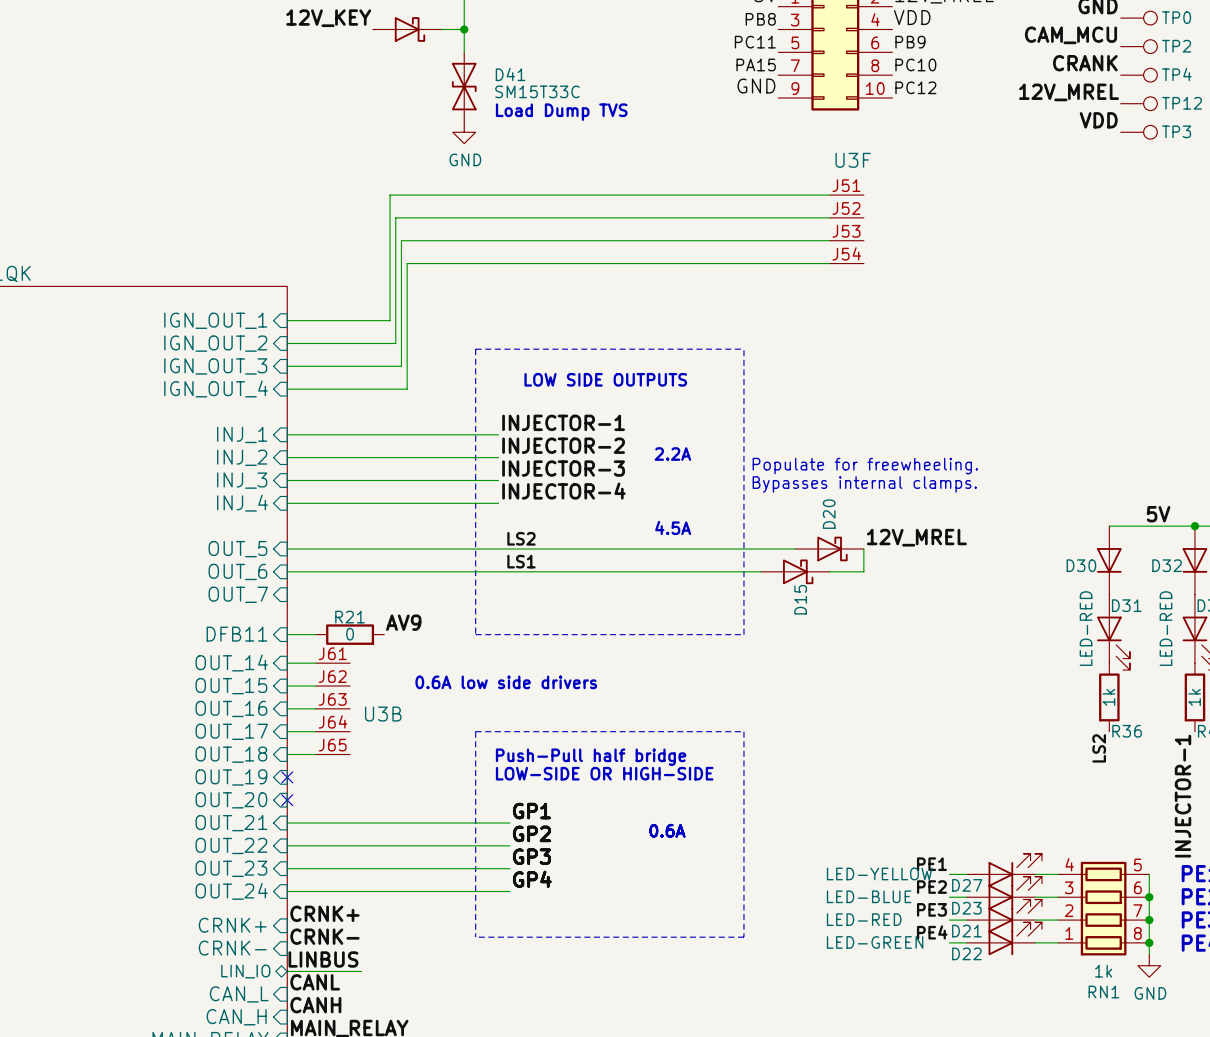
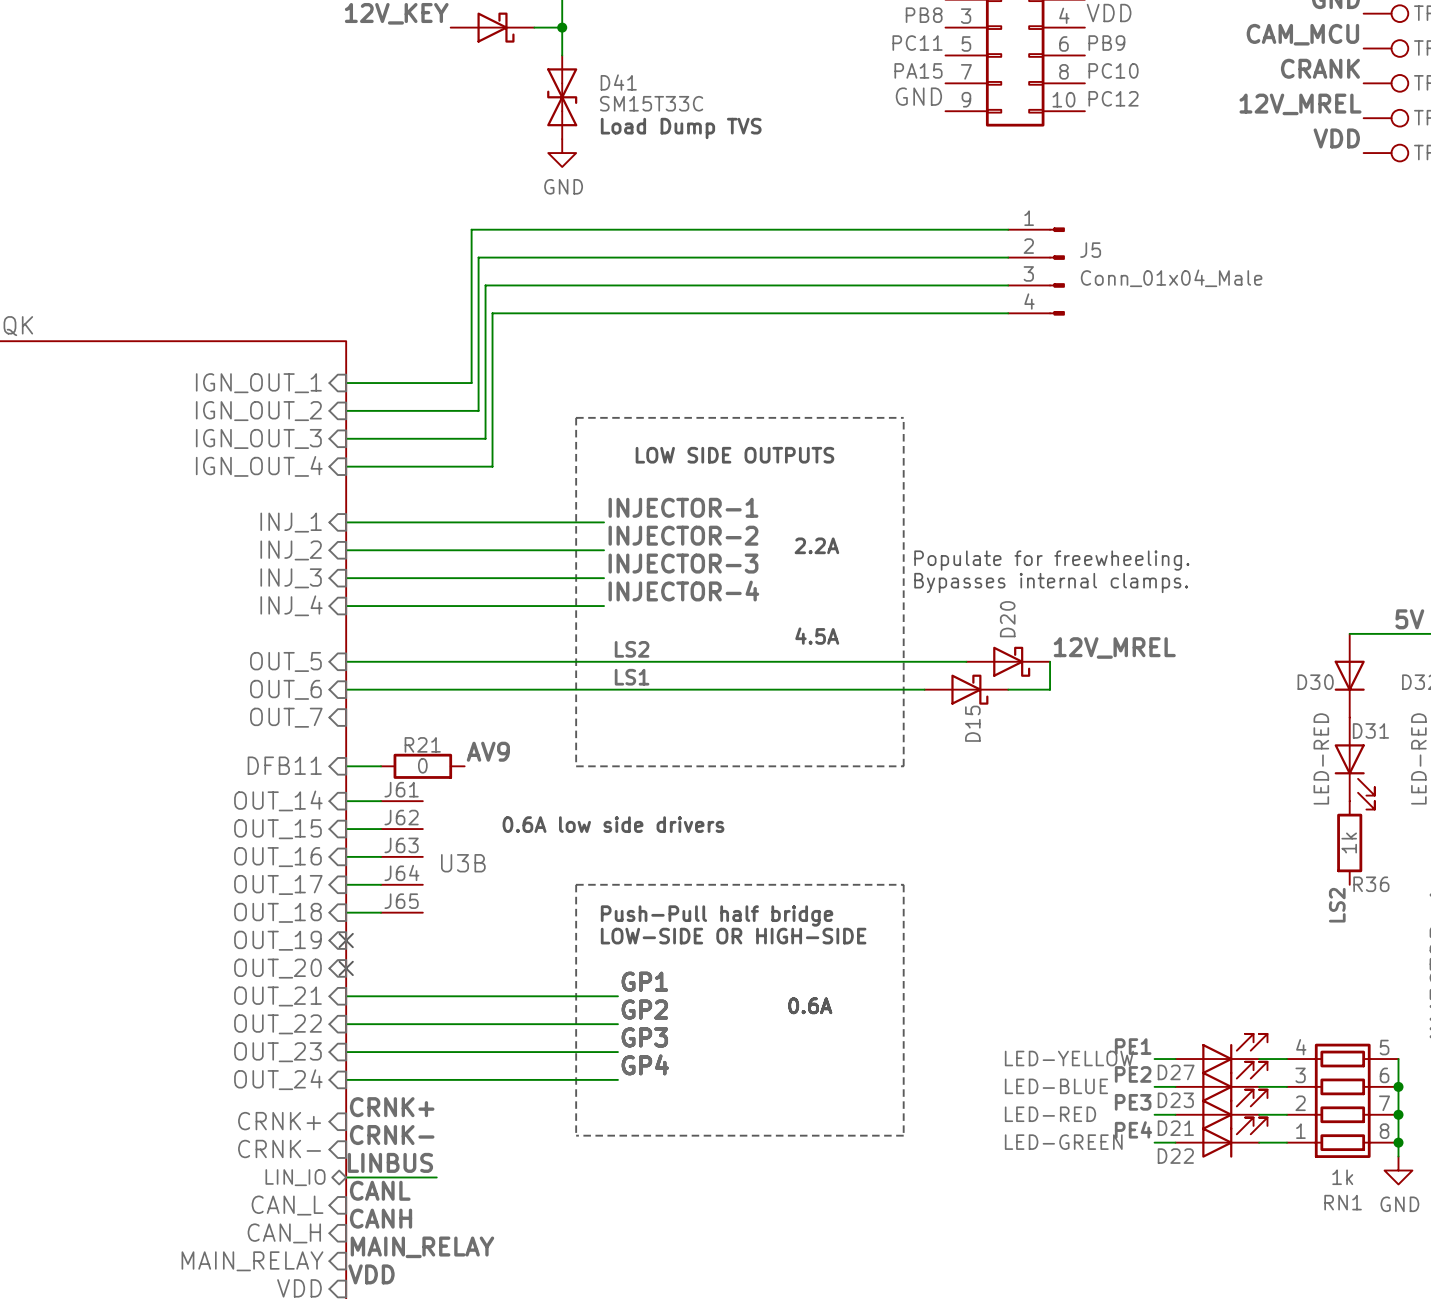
U3F: (846, 229) -> none
J5: none -> Conn_01x04_Male (1036, 271)

